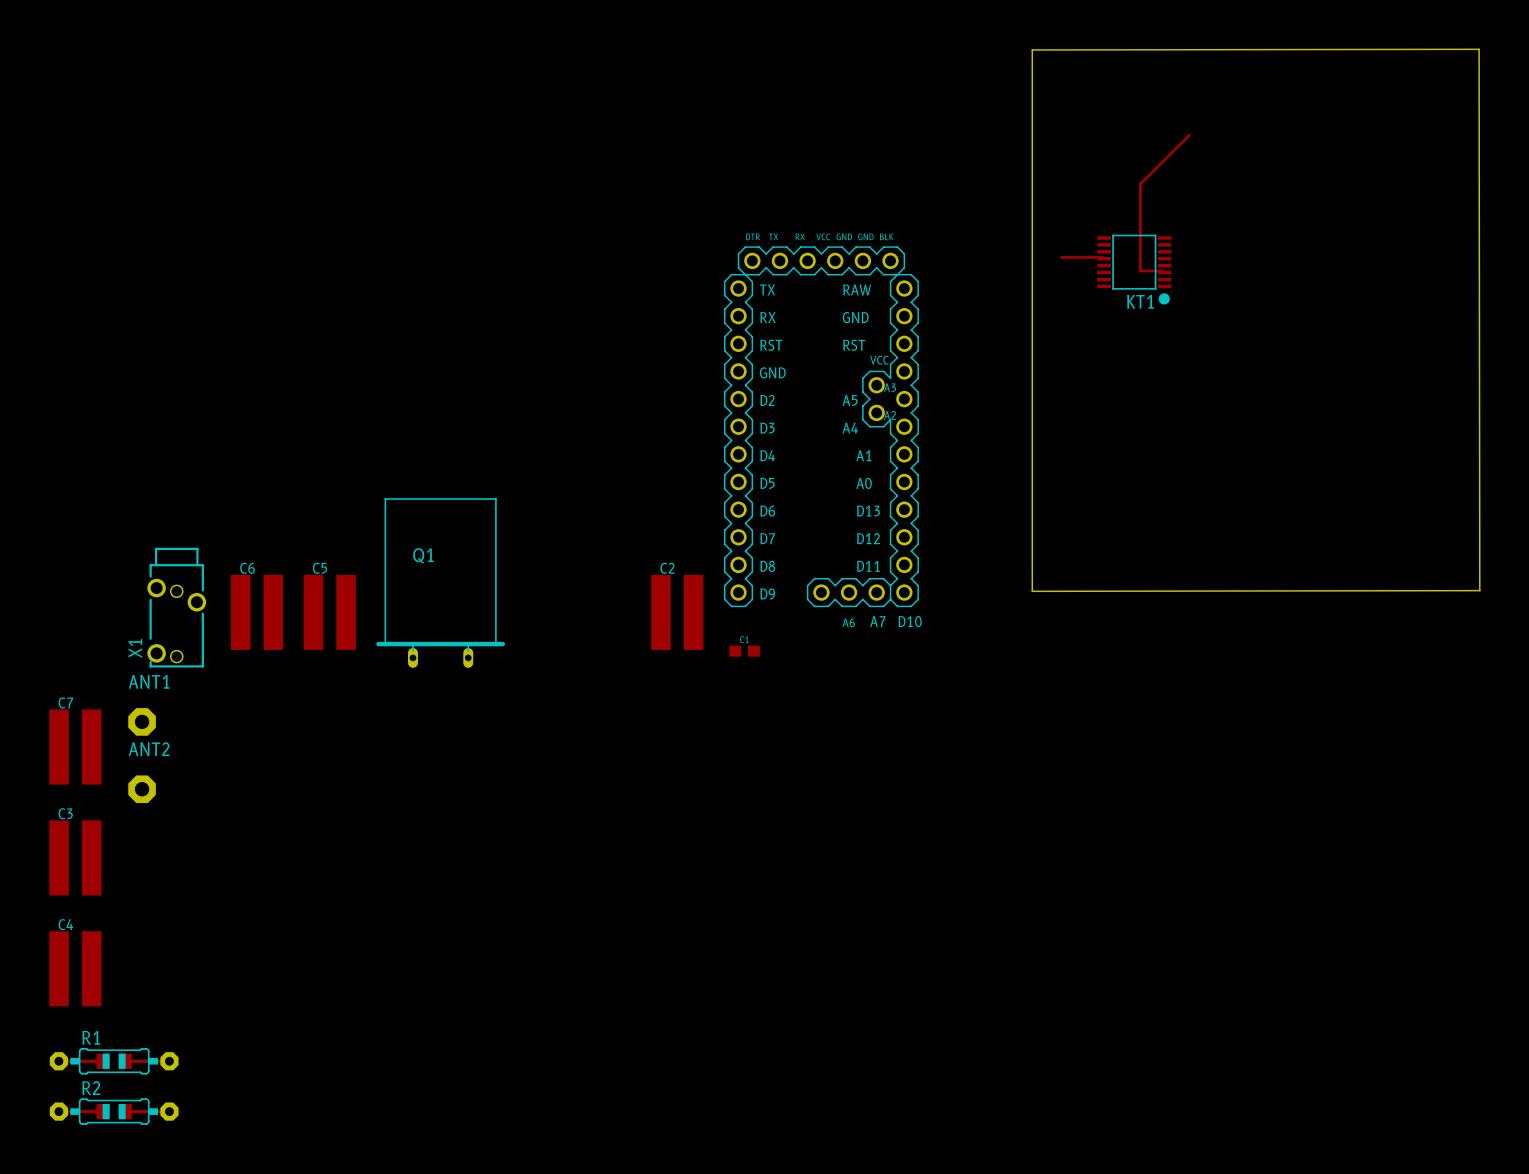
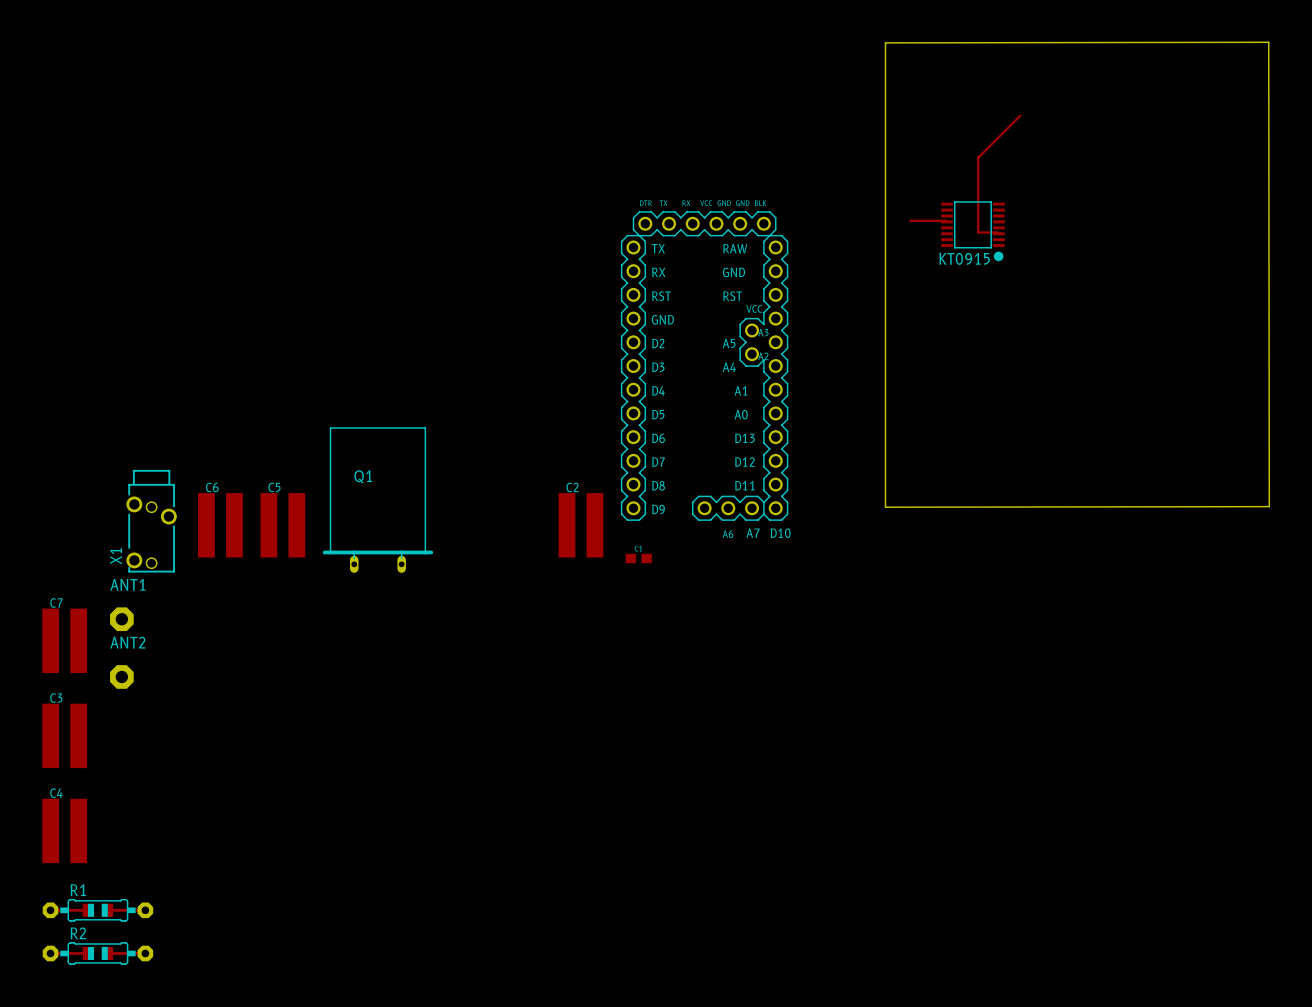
KT1 name: KT1 (1140, 301) -> KT0915 (964, 258)

